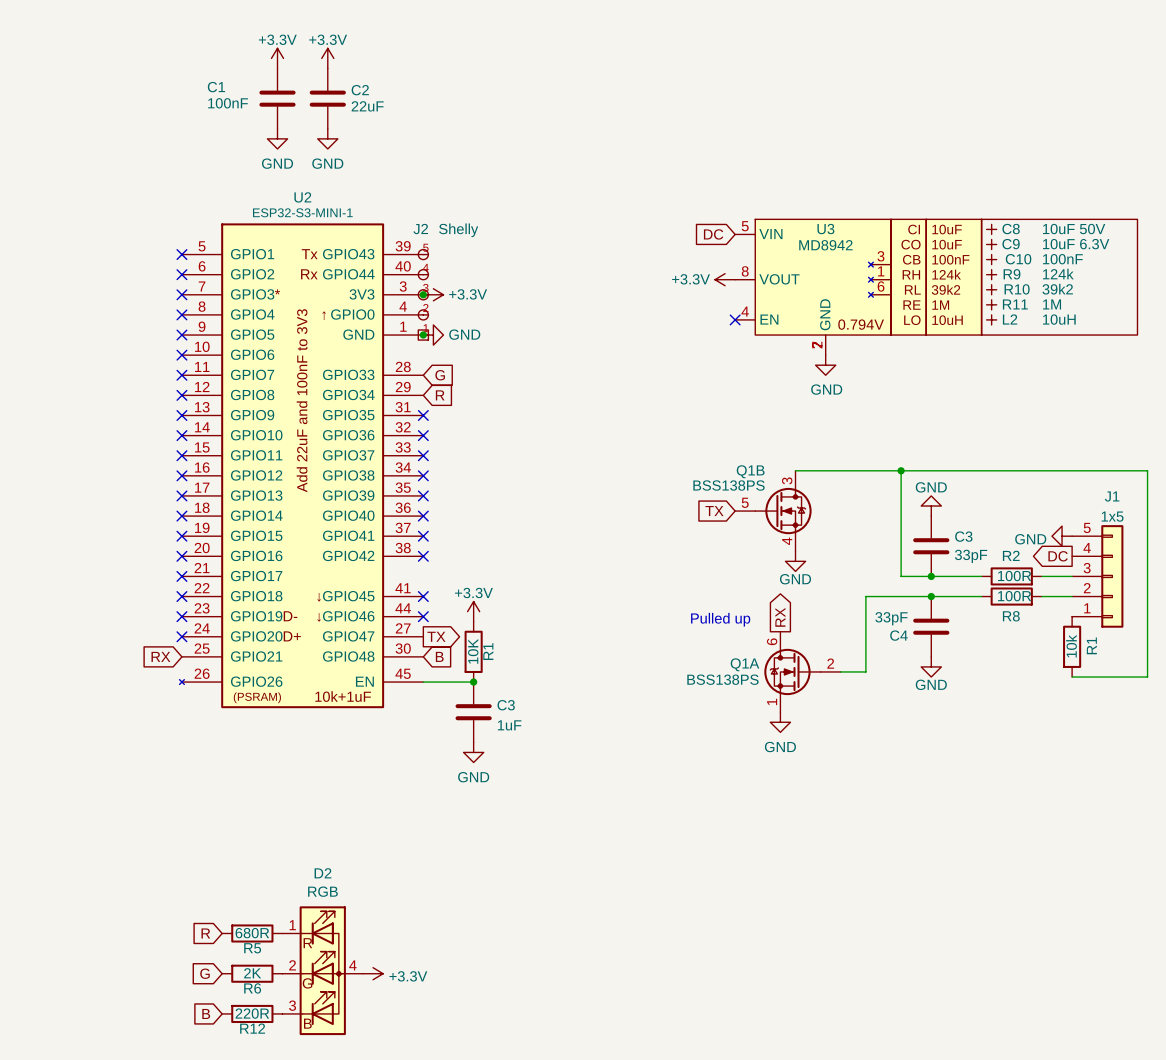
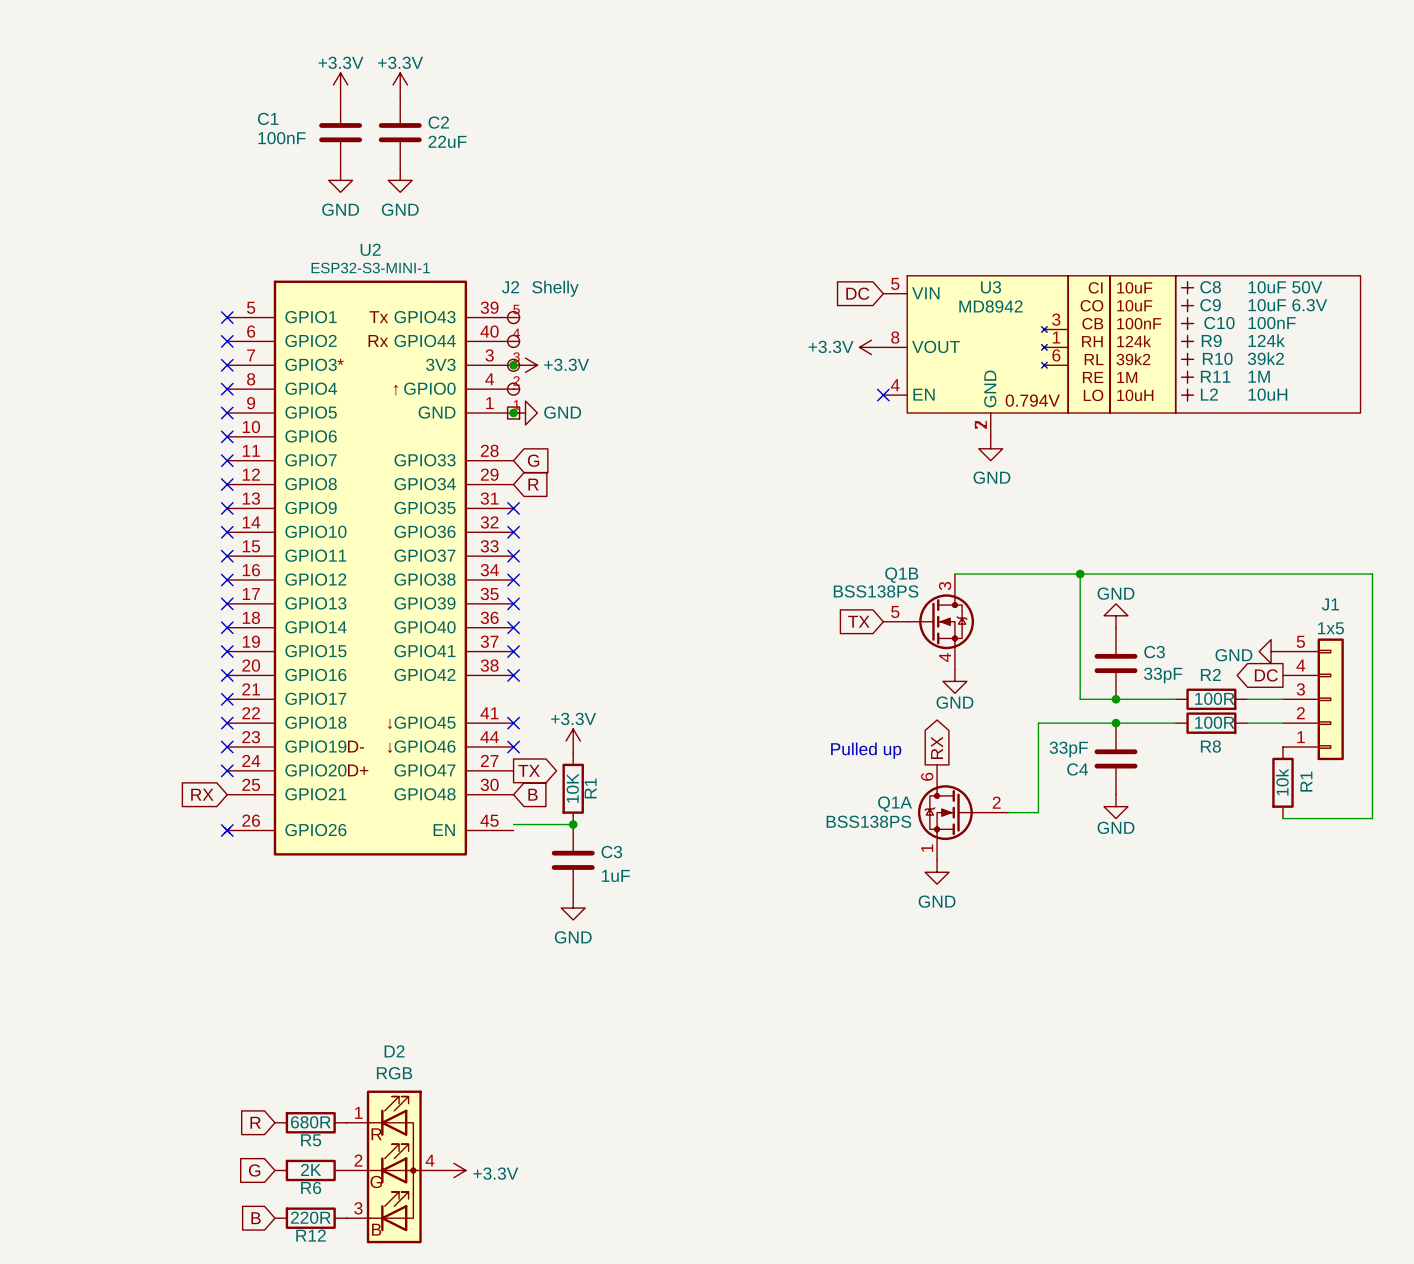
U2 symbol: [179, 223, 424, 709] -> [224, 280, 514, 856]
no-connect mark: none -> (227, 830)

